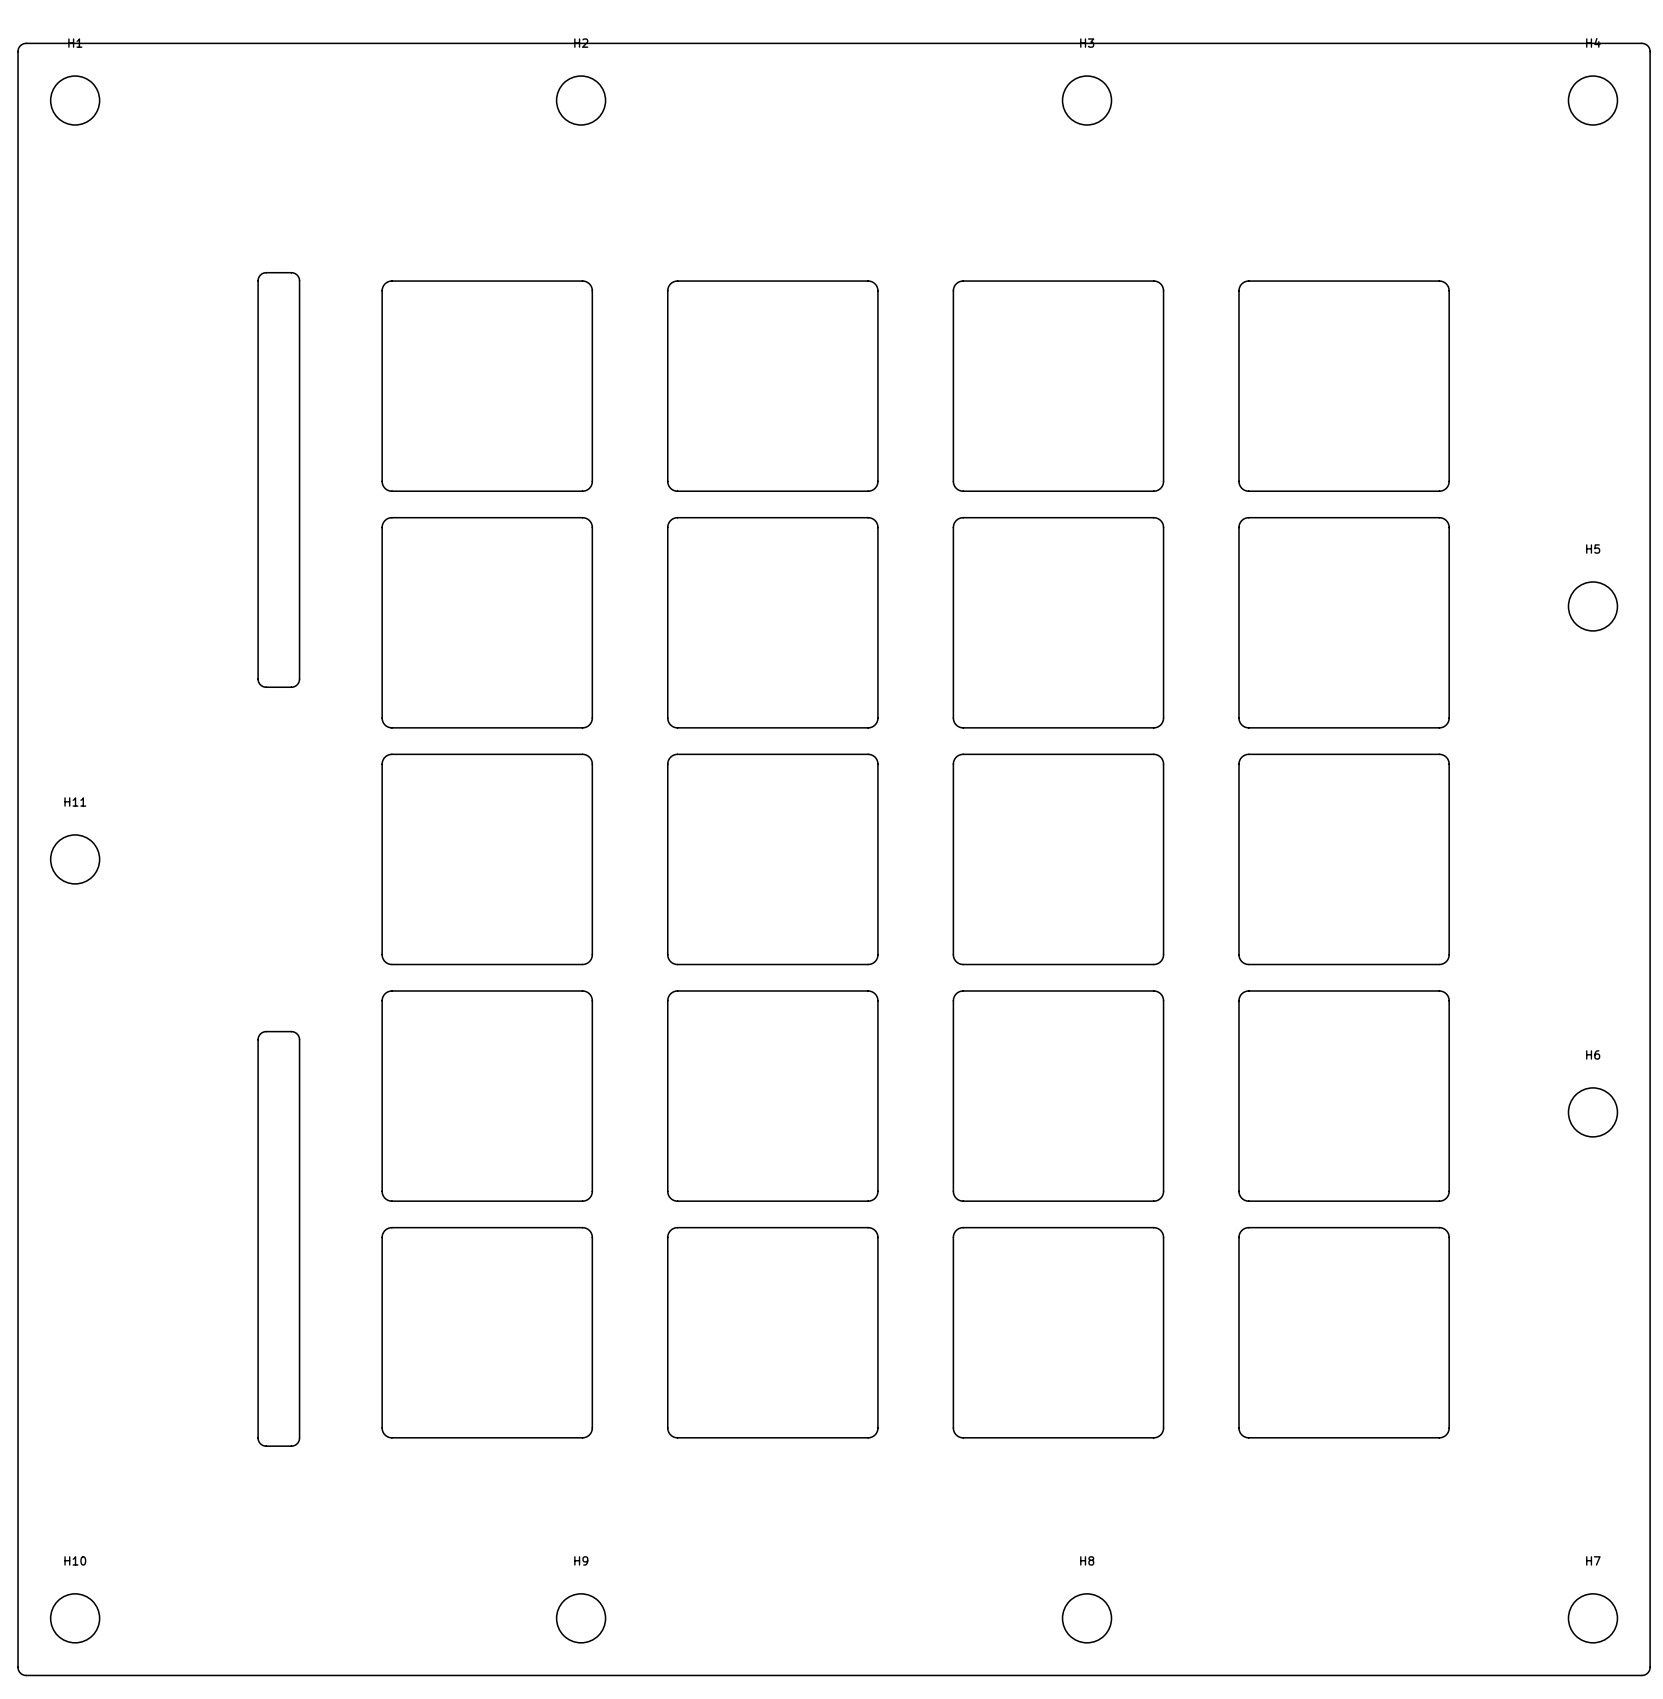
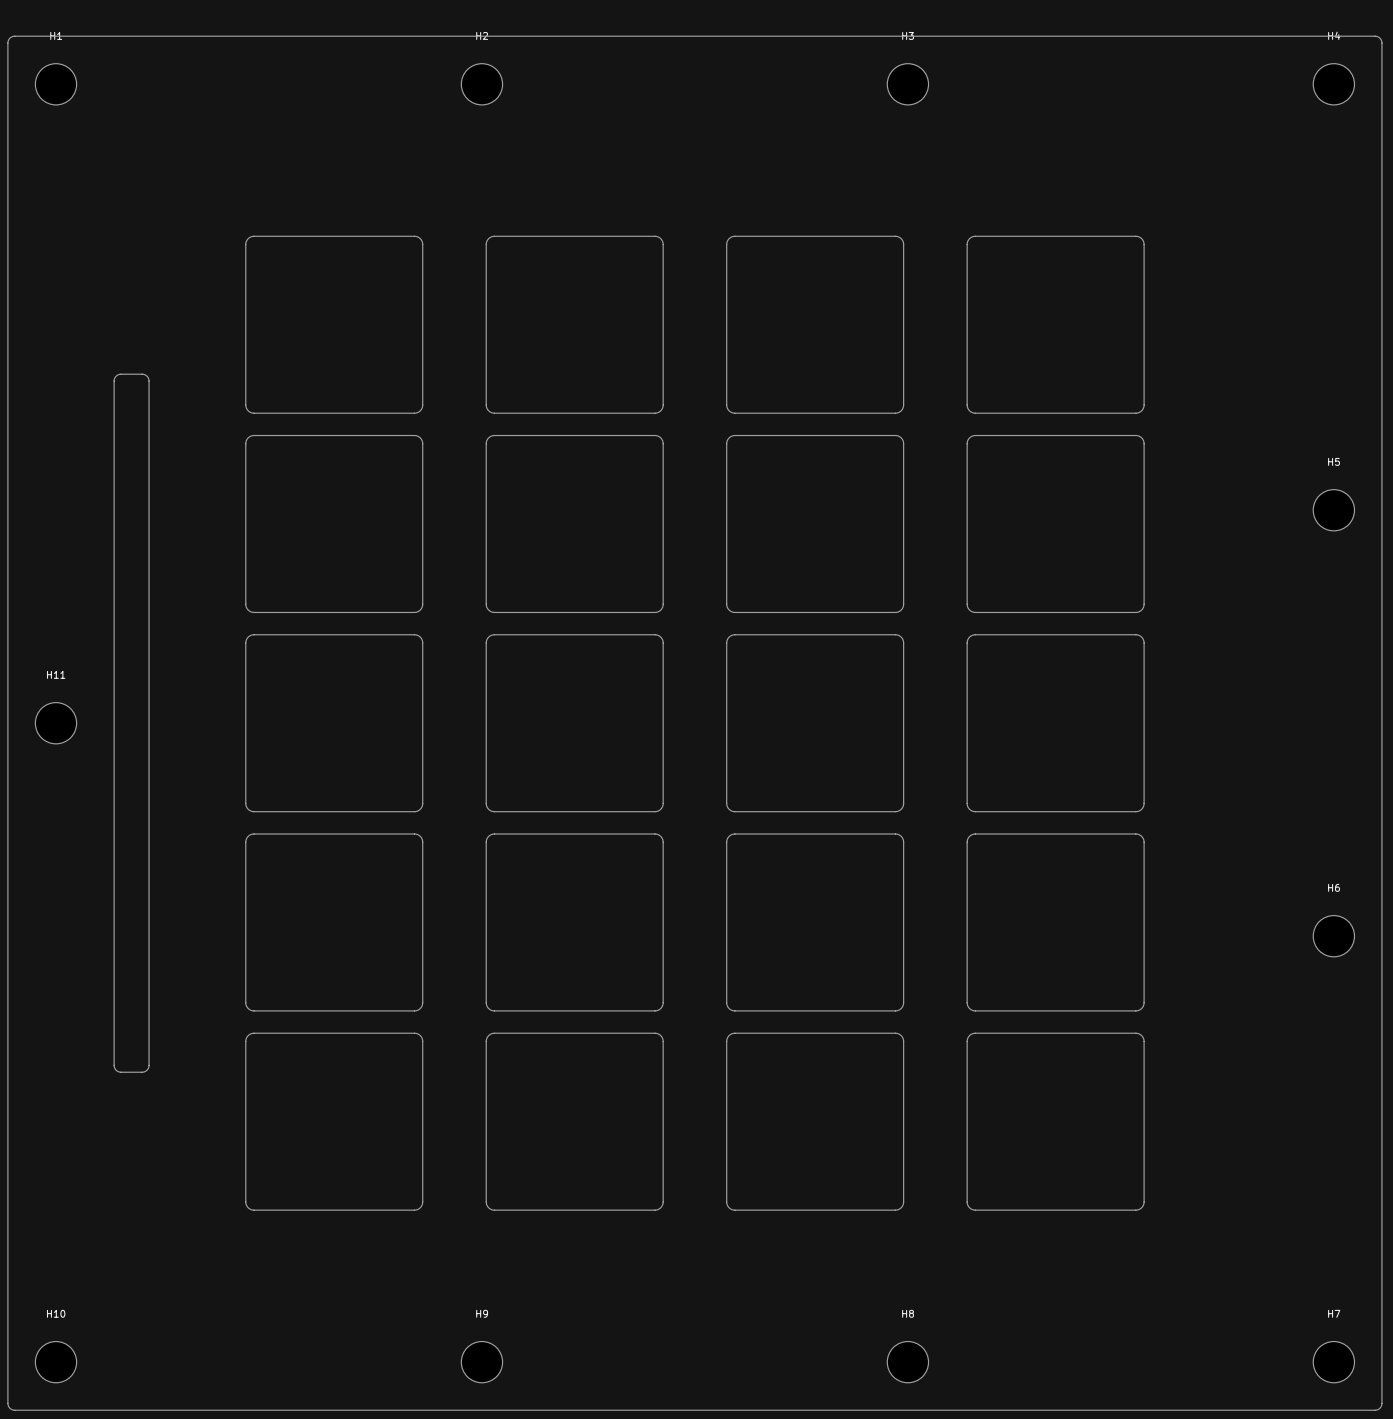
board edge: (266, 272) (293, 272) (297, 275) (299, 280) (299, 679) (297, 684) (291, 687) (264, 686) (259, 684) (258, 679) (258, 280) (260, 275) (266, 272) -> none
board edge: (391, 281) (385, 283) (382, 290) (382, 481) (385, 488) (391, 491) -> (322, 236) (252, 236) (247, 239) (245, 244) (246, 408) (252, 413) (322, 413)
board edge: (500, 281) (583, 281) (590, 284) (592, 290) (591, 485) (583, 491) (500, 491) -> (414, 236) (420, 238) (422, 244) (422, 404) (420, 410) (414, 413)
board edge: (677, 281) (670, 283) (667, 290) (667, 481) (670, 488) (677, 491) -> (563, 236) (493, 236) (487, 239) (486, 244) (486, 408) (493, 413) (563, 413)
board edge: (786, 281) (869, 281) (875, 284) (877, 290) (877, 485) (869, 491) (786, 491) -> (654, 236) (660, 238) (663, 244) (663, 404) (660, 410) (654, 413)
board edge: (963, 281) (956, 283) (953, 290) (953, 481) (956, 488) (963, 491) -> (803, 236) (733, 236) (728, 239) (726, 244) (727, 408) (733, 413) (803, 413)
board edge: (1072, 281) (1155, 281) (1161, 284) (1163, 290) (1162, 485) (1155, 491) (1072, 491) -> (895, 236) (901, 238) (903, 244) (903, 404) (901, 410) (895, 413)
board edge: (1248, 281) (1241, 283) (1239, 290) (1239, 481) (1241, 488) (1248, 491) -> (1044, 236) (974, 236) (968, 239) (967, 244) (967, 408) (974, 413) (1044, 413)
board edge: (1357, 281) (1440, 281) (1446, 283) (1449, 290) (1448, 485) (1440, 491) (1357, 491) -> (1135, 236) (1141, 238) (1144, 244) (1144, 404) (1141, 410) (1135, 413)
board edge: none -> (120, 374) (143, 374) (149, 381) (149, 1065) (147, 1070) (142, 1072) (119, 1072) (114, 1065) (114, 381) (116, 376) (120, 374)
board edge: (391, 517) (385, 520) (382, 527) (382, 718) (385, 724) (391, 727) -> (322, 435) (252, 435) (247, 438) (245, 443) (246, 607) (252, 612) (322, 612)
board edge: (500, 517) (583, 517) (590, 521) (592, 527) (591, 721) (583, 727) (500, 727) -> (414, 435) (420, 437) (422, 443) (422, 604) (420, 610) (414, 612)
board edge: (677, 517) (670, 520) (667, 527) (667, 718) (670, 724) (677, 727) -> (563, 435) (493, 435) (487, 438) (486, 443) (486, 607) (493, 612) (563, 612)
board edge: (786, 517) (869, 517) (875, 521) (877, 527) (877, 721) (869, 727) (786, 727) -> (654, 435) (660, 437) (663, 443) (663, 604) (660, 610) (654, 612)
board edge: (963, 517) (956, 520) (953, 527) (953, 718) (956, 724) (963, 727) -> (803, 435) (733, 435) (729, 437) (726, 443) (727, 607) (733, 612) (803, 612)
board edge: (1072, 517) (1155, 517) (1160, 520) (1163, 527) (1162, 721) (1155, 727) (1072, 727) -> (895, 435) (901, 437) (903, 443) (903, 604) (901, 610) (895, 612)
board edge: (1248, 517) (1241, 520) (1239, 527) (1239, 718) (1241, 724) (1248, 727) -> (1044, 435) (974, 435) (969, 437) (967, 443) (967, 607) (974, 612) (1044, 612)
board edge: (1357, 517) (1440, 517) (1446, 520) (1449, 527) (1448, 721) (1440, 727) (1357, 727) -> (1135, 435) (1141, 437) (1144, 443) (1144, 604) (1141, 610) (1135, 612)
board edge: (391, 754) (385, 757) (382, 764) (382, 954) (385, 961) (391, 964) -> (322, 634) (252, 634) (247, 637) (245, 643) (246, 806) (252, 811) (322, 811)
board edge: (500, 754) (583, 754) (590, 758) (592, 764) (591, 958) (583, 964) (500, 964) -> (414, 634) (420, 637) (422, 643) (422, 803) (420, 809) (414, 811)
board edge: (677, 754) (670, 757) (667, 764) (667, 954) (670, 961) (677, 964) -> (563, 634) (493, 634) (487, 637) (486, 643) (486, 806) (493, 811) (563, 811)
board edge: (786, 754) (869, 754) (875, 758) (877, 764) (877, 958) (869, 964) (786, 964) -> (654, 634) (660, 637) (663, 643) (663, 803) (660, 809) (654, 811)
board edge: (963, 754) (956, 757) (953, 764) (953, 954) (956, 961) (963, 964) -> (803, 634) (733, 634) (729, 637) (726, 643) (727, 806) (733, 811) (803, 811)
board edge: (1072, 754) (1155, 754) (1160, 757) (1163, 764) (1162, 958) (1155, 964) (1072, 964) -> (895, 634) (901, 637) (903, 643) (903, 803) (901, 809) (895, 811)
board edge: (1248, 754) (1241, 757) (1239, 764) (1239, 954) (1241, 961) (1248, 964) -> (1044, 634) (974, 634) (968, 637) (967, 643) (967, 806) (974, 811) (1044, 811)
board edge: (1357, 754) (1440, 754) (1446, 757) (1449, 764) (1448, 958) (1440, 964) (1357, 964) -> (1135, 634) (1141, 637) (1144, 643) (1144, 803) (1141, 809) (1135, 811)
board edge: (391, 991) (385, 993) (382, 1000) (382, 1191) (385, 1198) (391, 1201) -> (322, 833) (252, 834) (247, 837) (245, 842) (246, 1005) (252, 1010) (322, 1010)
board edge: (500, 991) (583, 991) (590, 994) (592, 1000) (591, 1195) (583, 1201) (500, 1201) -> (414, 833) (420, 836) (422, 842) (422, 1002) (420, 1008) (414, 1010)
board edge: (677, 991) (670, 993) (667, 1000) (667, 1191) (670, 1198) (677, 1201) -> (563, 833) (493, 834) (486, 839) (486, 1002) (487, 1007) (493, 1010) (563, 1010)
board edge: (786, 991) (869, 991) (875, 993) (877, 1000) (877, 1195) (869, 1201) (786, 1201) -> (654, 833) (660, 836) (663, 842) (663, 1002) (660, 1008) (654, 1010)
board edge: (963, 991) (956, 993) (953, 1000) (953, 1191) (956, 1198) (963, 1201) -> (803, 833) (733, 834) (728, 837) (726, 842) (727, 1005) (733, 1010) (803, 1010)
board edge: (1072, 991) (1155, 991) (1160, 993) (1163, 1000) (1162, 1195) (1155, 1201) (1072, 1201) -> (895, 833) (901, 836) (903, 842) (903, 1002) (901, 1008) (895, 1010)
board edge: (1248, 991) (1241, 993) (1239, 1000) (1239, 1191) (1241, 1198) (1248, 1201) -> (1044, 833) (974, 834) (967, 839) (967, 1002) (969, 1008) (974, 1010) (1044, 1010)
board edge: (1357, 991) (1440, 991) (1446, 993) (1449, 1000) (1448, 1195) (1440, 1201) (1357, 1201) -> (1135, 833) (1141, 836) (1144, 842) (1144, 1002) (1141, 1008) (1135, 1010)
board edge: (266, 1031) (293, 1031) (297, 1034) (299, 1039) (299, 1438) (297, 1443) (291, 1446) (264, 1445) (259, 1442) (258, 1438) (258, 1039) (260, 1034) (266, 1031) -> none
board edge: (391, 1227) (385, 1230) (382, 1237) (382, 1428) (385, 1434) (391, 1437) -> (322, 1033) (252, 1033) (248, 1035) (245, 1041) (246, 1205) (252, 1210) (322, 1210)
board edge: (500, 1227) (583, 1227) (590, 1231) (592, 1237) (591, 1431) (583, 1437) (500, 1437) -> (414, 1033) (420, 1035) (422, 1041) (422, 1201) (420, 1207) (414, 1210)
board edge: (677, 1227) (670, 1230) (667, 1237) (667, 1428) (670, 1434) (677, 1437) -> (563, 1033) (493, 1033) (488, 1035) (486, 1041) (486, 1205) (493, 1210) (563, 1210)
board edge: (786, 1227) (869, 1227) (875, 1231) (877, 1237) (877, 1431) (869, 1437) (786, 1437) -> (654, 1033) (660, 1035) (663, 1041) (663, 1201) (660, 1207) (654, 1210)
board edge: (963, 1227) (956, 1230) (953, 1237) (953, 1428) (956, 1434) (963, 1437) -> (803, 1033) (733, 1033) (729, 1035) (726, 1041) (727, 1205) (733, 1210) (803, 1210)
board edge: (1072, 1227) (1155, 1227) (1160, 1230) (1163, 1237) (1162, 1431) (1155, 1437) (1072, 1437) -> (895, 1033) (901, 1035) (903, 1041) (903, 1201) (901, 1207) (895, 1210)
board edge: (1248, 1227) (1241, 1230) (1239, 1237) (1239, 1428) (1241, 1434) (1248, 1437) -> (1044, 1033) (974, 1033) (969, 1035) (967, 1041) (967, 1205) (974, 1210) (1044, 1210)
board edge: (1357, 1227) (1440, 1227) (1446, 1230) (1449, 1237) (1448, 1431) (1440, 1437) (1357, 1437) -> (1135, 1033) (1141, 1035) (1144, 1041) (1144, 1201) (1141, 1207) (1135, 1210)

